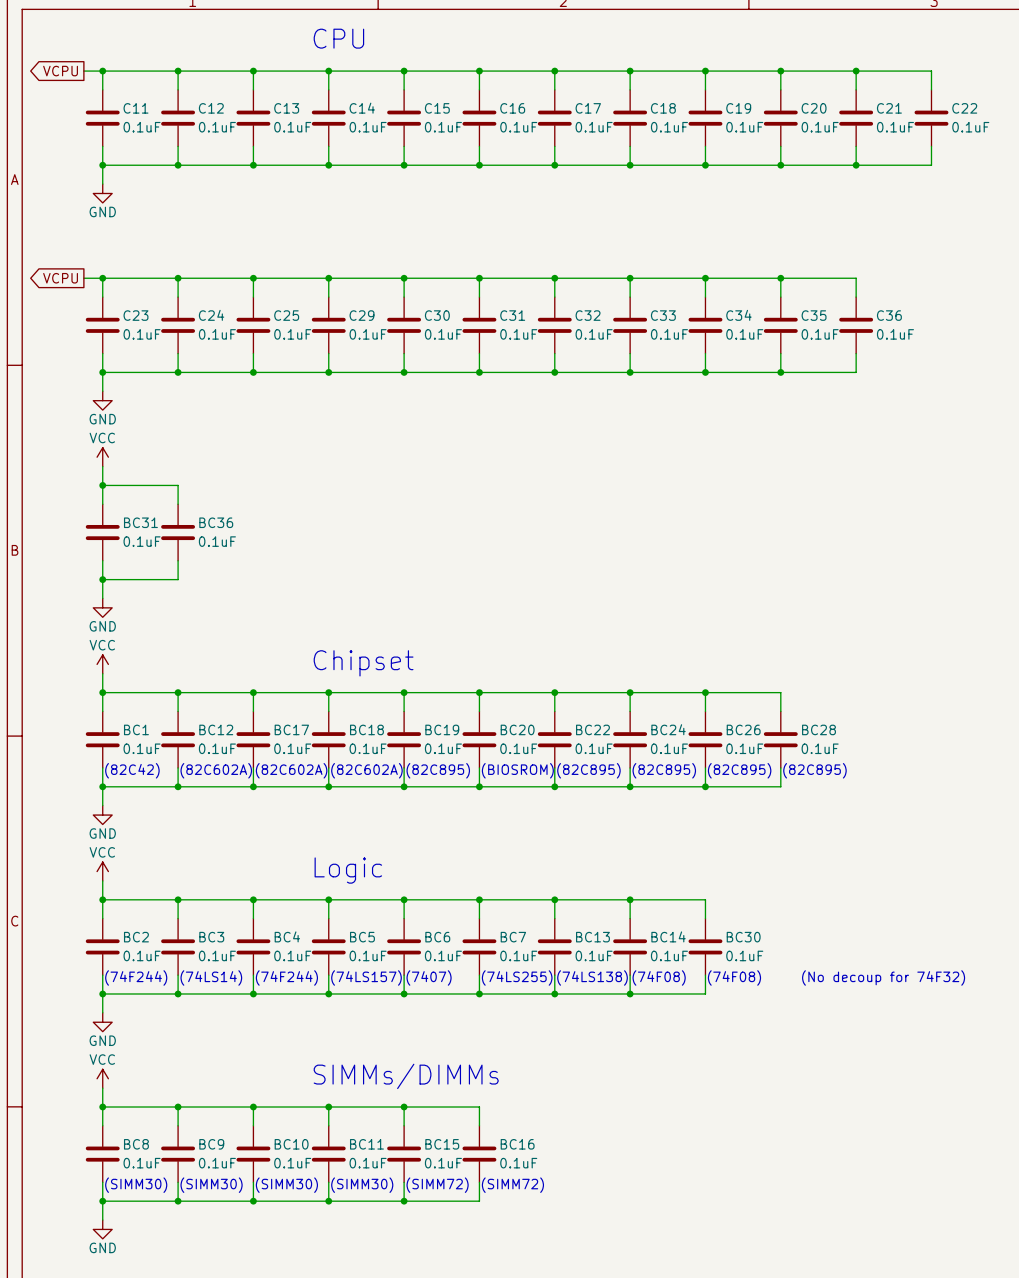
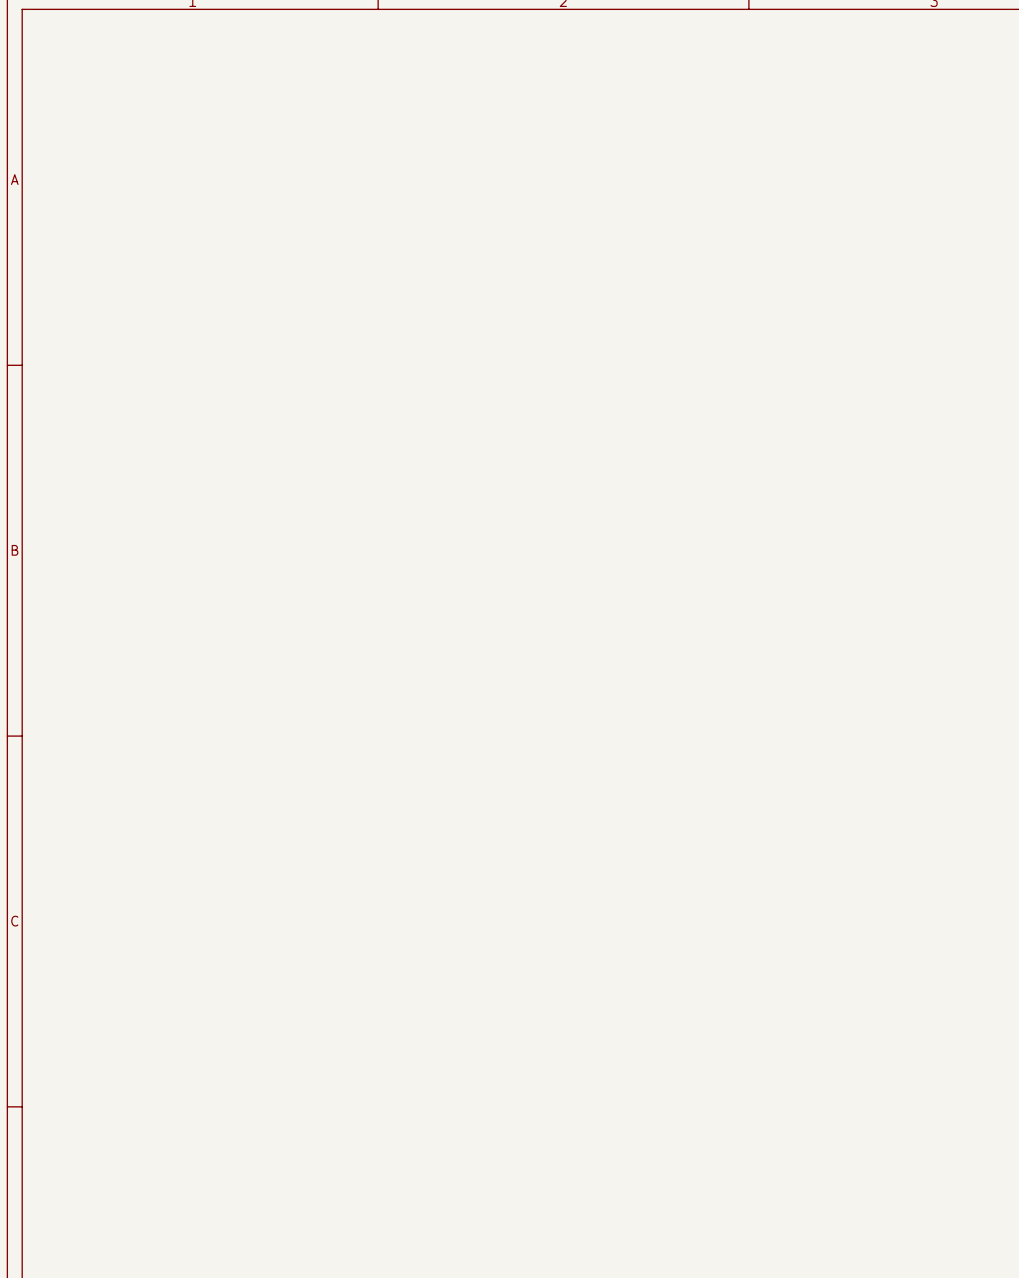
text: CPU (338, 38) -> none
global label: VCPU (60, 71) -> none
wire: (83, 71) (931, 71) (931, 89) -> none
wire: (102, 71) (102, 89) -> none
junction: (102, 71) -> none
wire: (178, 71) (178, 89) -> none
junction: (178, 71) -> none
wire: (253, 71) (253, 89) -> none
junction: (253, 71) -> none
wire: (328, 71) (328, 89) -> none
junction: (328, 71) -> none
wire: (404, 71) (404, 89) -> none
junction: (404, 71) -> none
wire: (479, 71) (479, 89) -> none
junction: (479, 71) -> none
wire: (554, 71) (554, 89) -> none
junction: (554, 71) -> none
wire: (630, 71) (630, 89) -> none
junction: (630, 71) -> none
wire: (705, 71) (705, 89) -> none
junction: (705, 71) -> none
wire: (780, 71) (780, 89) -> none
junction: (780, 71) -> none
wire: (856, 71) (856, 89) -> none
junction: (856, 71) -> none
C11: 0.1uF (102, 118) -> none
C12: 0.1uF (178, 118) -> none
C13: 0.1uF (253, 118) -> none
C14: 0.1uF (328, 118) -> none
C15: 0.1uF (404, 118) -> none
C16: 0.1uF (479, 118) -> none
C17: 0.1uF (554, 118) -> none
C18: 0.1uF (630, 118) -> none
C19: 0.1uF (705, 118) -> none
C20: 0.1uF (780, 118) -> none
C21: 0.1uF (856, 118) -> none
C22: 0.1uF (931, 118) -> none
wire: (102, 146) (102, 184) -> none
wire: (178, 146) (178, 165) -> none
wire: (253, 146) (253, 165) -> none
wire: (328, 146) (328, 165) -> none
wire: (404, 146) (404, 165) -> none
wire: (479, 146) (479, 165) -> none
wire: (554, 146) (554, 165) -> none
wire: (630, 146) (630, 165) -> none
wire: (705, 146) (705, 165) -> none
wire: (780, 146) (780, 165) -> none
wire: (856, 146) (856, 165) -> none
wire: (931, 146) (931, 165) (102, 165) -> none
junction: (102, 165) -> none
junction: (178, 165) -> none
junction: (253, 165) -> none
junction: (328, 165) -> none
junction: (404, 165) -> none
junction: (479, 165) -> none
junction: (554, 165) -> none
junction: (630, 165) -> none
junction: (705, 165) -> none
junction: (780, 165) -> none
junction: (856, 165) -> none
power symbol: GND (102, 193) -> none
global label: VCPU (60, 278) -> none
wire: (83, 278) (856, 278) (856, 297) -> none
wire: (102, 278) (102, 297) -> none
junction: (102, 278) -> none
wire: (178, 278) (178, 297) -> none
junction: (178, 278) -> none
wire: (253, 278) (253, 297) -> none
junction: (253, 278) -> none
wire: (328, 278) (328, 297) -> none
junction: (328, 278) -> none
wire: (404, 278) (404, 297) -> none
junction: (404, 278) -> none
wire: (479, 278) (479, 297) -> none
junction: (479, 278) -> none
wire: (554, 278) (554, 297) -> none
junction: (554, 278) -> none
wire: (630, 278) (630, 297) -> none
junction: (630, 278) -> none
wire: (705, 278) (705, 297) -> none
junction: (705, 278) -> none
wire: (780, 278) (780, 297) -> none
junction: (780, 278) -> none
C23: 0.1uF (102, 325) -> none
C24: 0.1uF (178, 325) -> none
C25: 0.1uF (253, 325) -> none
C29: 0.1uF (328, 325) -> none
C30: 0.1uF (404, 325) -> none
C31: 0.1uF (479, 325) -> none
C32: 0.1uF (554, 325) -> none
C33: 0.1uF (630, 325) -> none
C34: 0.1uF (705, 325) -> none
C35: 0.1uF (780, 325) -> none
C36: 0.1uF (856, 325) -> none
wire: (102, 353) (102, 391) -> none
wire: (178, 353) (178, 372) -> none
wire: (253, 353) (253, 372) -> none
wire: (328, 353) (328, 372) -> none
wire: (404, 353) (404, 372) -> none
wire: (479, 353) (479, 372) -> none
wire: (554, 353) (554, 372) -> none
wire: (630, 353) (630, 372) -> none
wire: (705, 353) (705, 372) -> none
wire: (780, 353) (780, 372) -> none
wire: (856, 353) (856, 372) (102, 372) -> none
junction: (102, 372) -> none
junction: (178, 372) -> none
junction: (253, 372) -> none
junction: (328, 372) -> none
junction: (404, 372) -> none
junction: (479, 372) -> none
junction: (554, 372) -> none
junction: (630, 372) -> none
junction: (705, 372) -> none
junction: (780, 372) -> none
power symbol: GND (102, 400) -> none
power symbol: VCC (102, 457) -> none
wire: (102, 466) (102, 504) -> none
wire: (102, 485) (178, 485) (178, 504) -> none
junction: (102, 485) -> none
BC31: 0.1uF (102, 532) -> none
BC36: 0.1uF (178, 532) -> none
wire: (102, 560) (102, 598) -> none
wire: (178, 560) (178, 579) (102, 579) -> none
junction: (102, 579) -> none
power symbol: GND (102, 607) -> none
text: Chipset (363, 663) -> none
power symbol: VCC (102, 664) -> none
wire: (102, 673) (102, 711) -> none
wire: (102, 692) (780, 692) (780, 711) -> none
junction: (102, 692) -> none
wire: (178, 692) (178, 711) -> none
junction: (178, 692) -> none
wire: (253, 692) (253, 711) -> none
junction: (253, 692) -> none
wire: (328, 692) (328, 711) -> none
junction: (328, 692) -> none
wire: (404, 692) (404, 711) -> none
junction: (404, 692) -> none
wire: (479, 692) (479, 711) -> none
junction: (479, 692) -> none
wire: (554, 692) (554, 711) -> none
junction: (554, 692) -> none
wire: (630, 692) (630, 711) -> none
junction: (630, 692) -> none
wire: (705, 692) (705, 711) -> none
junction: (705, 692) -> none
BC1: 0.1uF (102, 739) -> none
BC12: 0.1uF (178, 739) -> none
BC17: 0.1uF (253, 739) -> none
BC18: 0.1uF (328, 739) -> none
BC19: 0.1uF (404, 739) -> none
BC20: 0.1uF (479, 739) -> none
BC22: 0.1uF (554, 739) -> none
BC24: 0.1uF (630, 739) -> none
BC26: 0.1uF (705, 739) -> none
BC28: 0.1uF (780, 739) -> none
wire: (102, 767) (102, 805) -> none
wire: (178, 767) (178, 786) -> none
wire: (253, 767) (253, 786) -> none
wire: (328, 767) (328, 786) -> none
wire: (404, 767) (404, 786) -> none
wire: (479, 767) (479, 786) -> none
wire: (554, 767) (554, 786) -> none
wire: (630, 767) (630, 786) -> none
wire: (705, 767) (705, 786) -> none
wire: (780, 767) (780, 786) (102, 786) -> none
text: (82C42) (132, 770) -> none
text: (82C602A) (216, 770) -> none
text: (82C602A) (291, 770) -> none
text: (82C602A) (366, 770) -> none
text: (82C895) (438, 770) -> none
text: (BIOSROM) (517, 770) -> none
text: (82C895) (588, 770) -> none
text: (82C895) (664, 770) -> none
text: (82C895) (739, 770) -> none
text: (82C895) (814, 770) -> none
junction: (102, 786) -> none
junction: (178, 786) -> none
junction: (253, 786) -> none
junction: (328, 786) -> none
junction: (404, 786) -> none
junction: (479, 786) -> none
junction: (554, 786) -> none
junction: (630, 786) -> none
junction: (705, 786) -> none
power symbol: GND (102, 815) -> none
text: Logic (348, 870) -> none
power symbol: VCC (102, 871) -> none
wire: (102, 880) (102, 918) -> none
wire: (102, 899) (705, 899) (705, 918) -> none
junction: (102, 899) -> none
wire: (178, 899) (178, 918) -> none
junction: (178, 899) -> none
wire: (253, 899) (253, 918) -> none
junction: (253, 899) -> none
wire: (328, 899) (328, 918) -> none
junction: (328, 899) -> none
wire: (404, 899) (404, 918) -> none
junction: (404, 899) -> none
wire: (479, 899) (479, 918) -> none
junction: (479, 899) -> none
wire: (554, 899) (554, 918) -> none
junction: (554, 899) -> none
wire: (630, 899) (630, 918) -> none
junction: (630, 899) -> none
BC2: 0.1uF (102, 946) -> none
BC3: 0.1uF (178, 946) -> none
BC4: 0.1uF (253, 946) -> none
BC5: 0.1uF (328, 946) -> none
BC6: 0.1uF (404, 946) -> none
BC7: 0.1uF (479, 946) -> none
BC13: 0.1uF (554, 946) -> none
BC14: 0.1uF (630, 946) -> none
BC30: 0.1uF (705, 946) -> none
wire: (102, 975) (102, 1012) -> none
wire: (178, 975) (178, 993) -> none
wire: (253, 975) (253, 993) -> none
wire: (328, 975) (328, 993) -> none
wire: (404, 975) (404, 993) -> none
wire: (479, 975) (479, 993) -> none
wire: (554, 975) (554, 993) -> none
wire: (630, 975) (630, 993) -> none
wire: (705, 975) (705, 993) (102, 993) -> none
text: (74F244) (136, 977) -> none
text: (74LS14) (211, 977) -> none
text: (74F244) (286, 977) -> none
text: (74LS157) (366, 977) -> none
text: (7407) (429, 977) -> none
text: (74LS255) (517, 977) -> none
text: (74LS138) (592, 977) -> none
text: (74F08) (659, 977) -> none
text: (74F08) (734, 977) -> none
text: (No decoup for 74F32) (883, 977) -> none
junction: (102, 993) -> none
junction: (178, 993) -> none
junction: (253, 993) -> none
junction: (328, 993) -> none
junction: (404, 993) -> none
junction: (479, 993) -> none
junction: (554, 993) -> none
junction: (630, 993) -> none
power symbol: GND (102, 1022) -> none
text: SIMMs/DIMMs (406, 1076) -> none
power symbol: VCC (102, 1078) -> none
wire: (102, 1088) (102, 1125) -> none
wire: (102, 1107) (479, 1107) (479, 1125) -> none
junction: (102, 1107) -> none
wire: (178, 1107) (178, 1125) -> none
junction: (178, 1107) -> none
wire: (253, 1107) (253, 1125) -> none
junction: (253, 1107) -> none
wire: (328, 1107) (328, 1125) -> none
junction: (328, 1107) -> none
wire: (404, 1107) (404, 1125) -> none
junction: (404, 1107) -> none
BC8: 0.1uF (102, 1154) -> none
BC9: 0.1uF (178, 1154) -> none
BC10: 0.1uF (253, 1154) -> none
BC11: 0.1uF (328, 1154) -> none
BC15: 0.1uF (404, 1154) -> none
BC16: 0.1uF (479, 1154) -> none
wire: (102, 1182) (102, 1220) -> none
wire: (178, 1182) (178, 1201) -> none
wire: (253, 1182) (253, 1201) -> none
wire: (328, 1182) (328, 1201) -> none
wire: (404, 1182) (404, 1201) -> none
wire: (479, 1182) (479, 1201) (102, 1201) -> none
text: (SIMM30) (136, 1185) -> none
text: (SIMM30) (211, 1185) -> none
text: (SIMM30) (286, 1185) -> none
text: (SIMM30) (362, 1185) -> none
text: (SIMM72) (437, 1185) -> none
text: (SIMM72) (512, 1185) -> none
junction: (102, 1201) -> none
junction: (178, 1201) -> none
junction: (253, 1201) -> none
junction: (328, 1201) -> none
junction: (404, 1201) -> none
power symbol: GND (102, 1229) -> none

